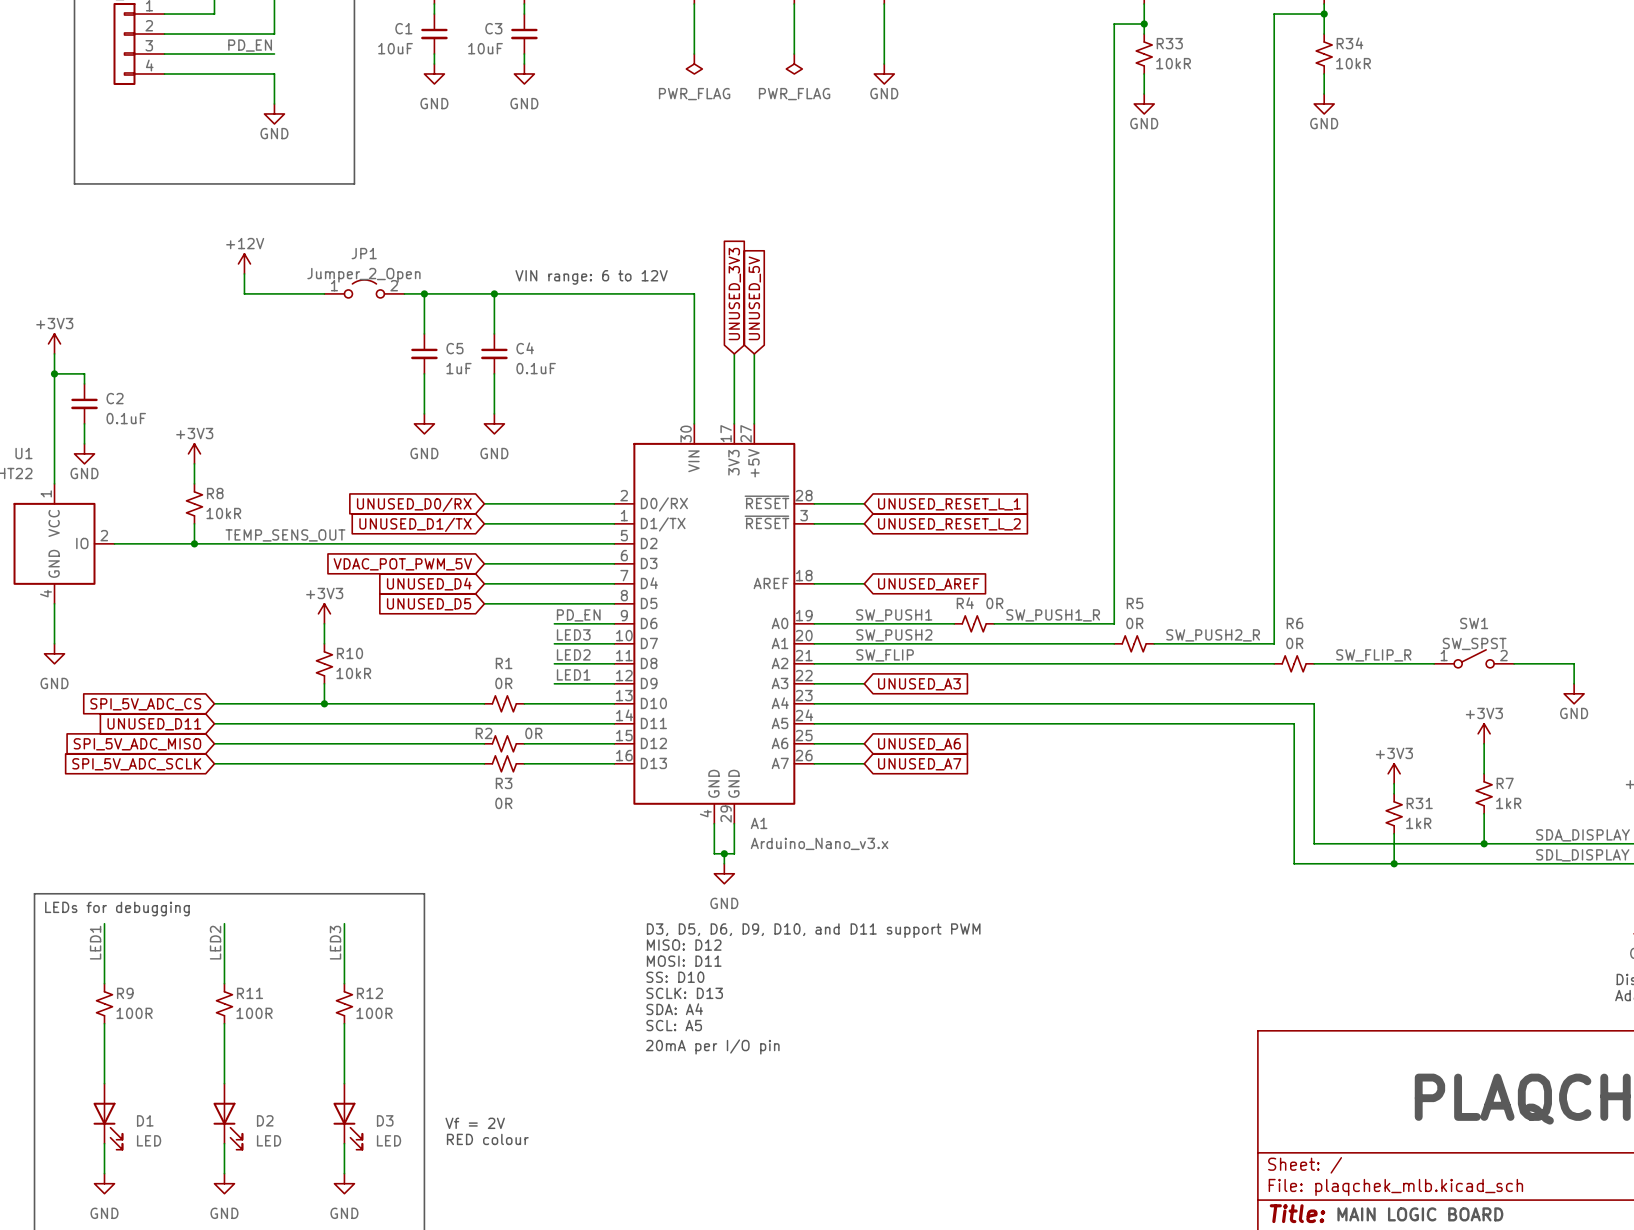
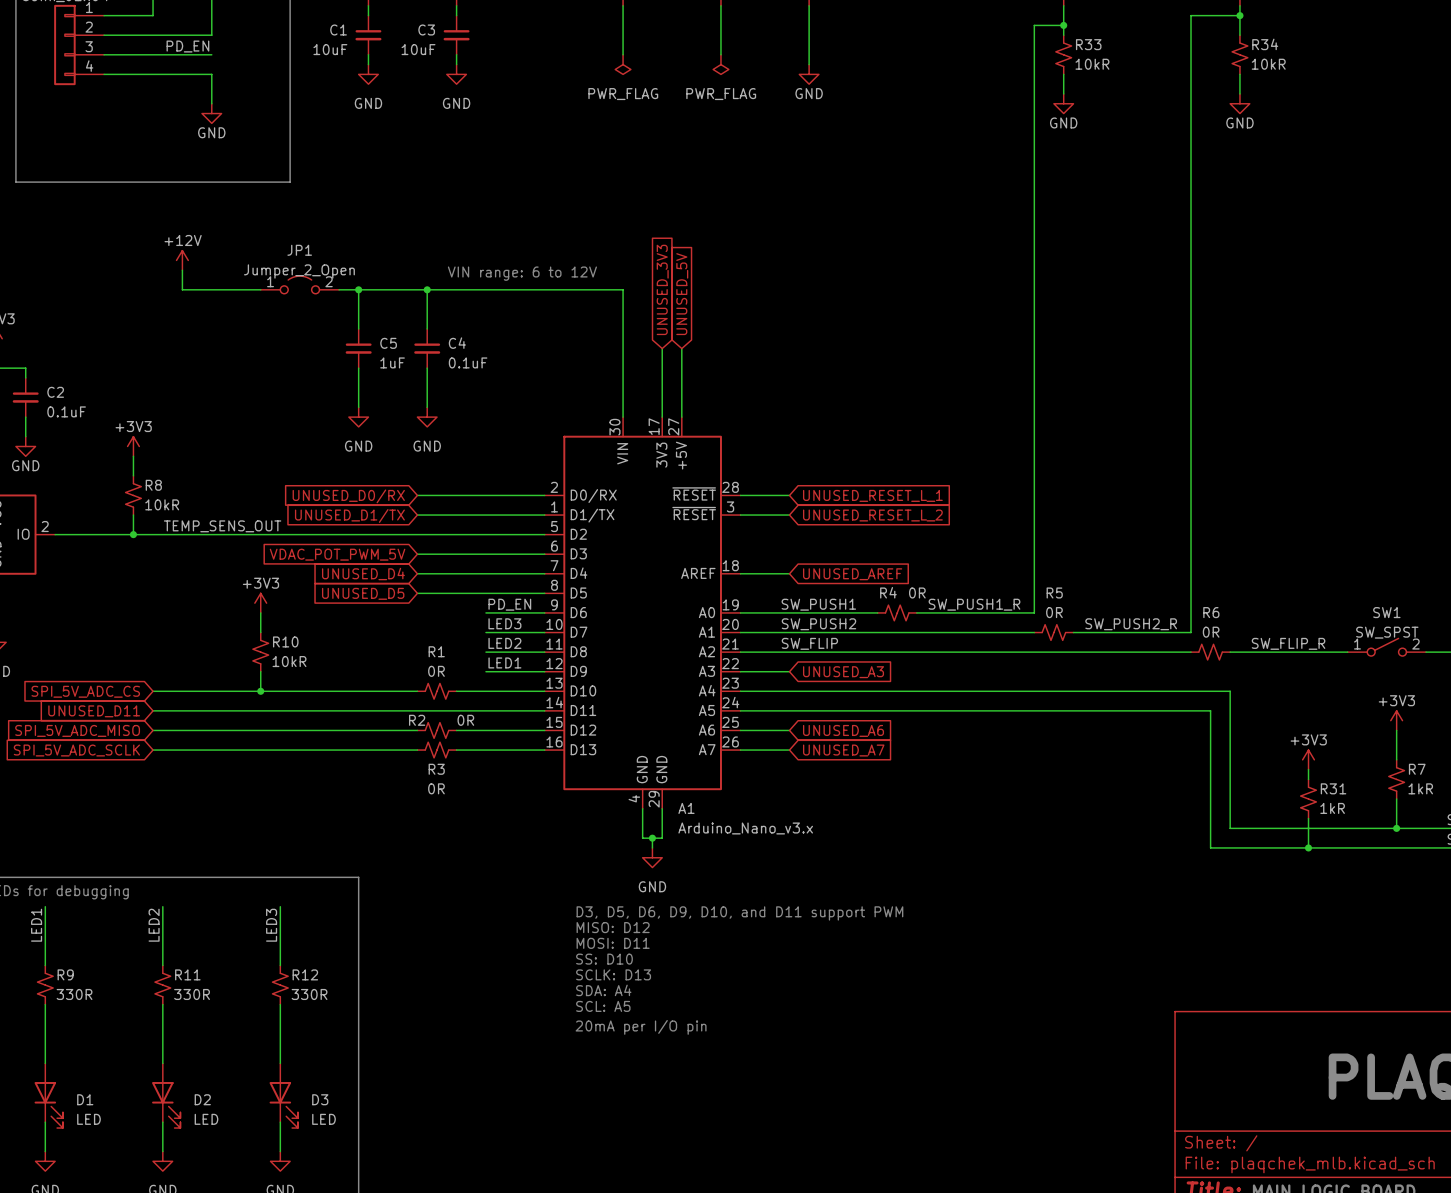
R9 value: 100R (134, 1013) -> 330R (74, 994)
R11 value: 100R (254, 1013) -> 330R (192, 994)
R12 value: 100R (374, 1013) -> 330R (309, 994)
text: Vf = 2V (475, 1123) -> none
text: RED colour (487, 1139) -> none

